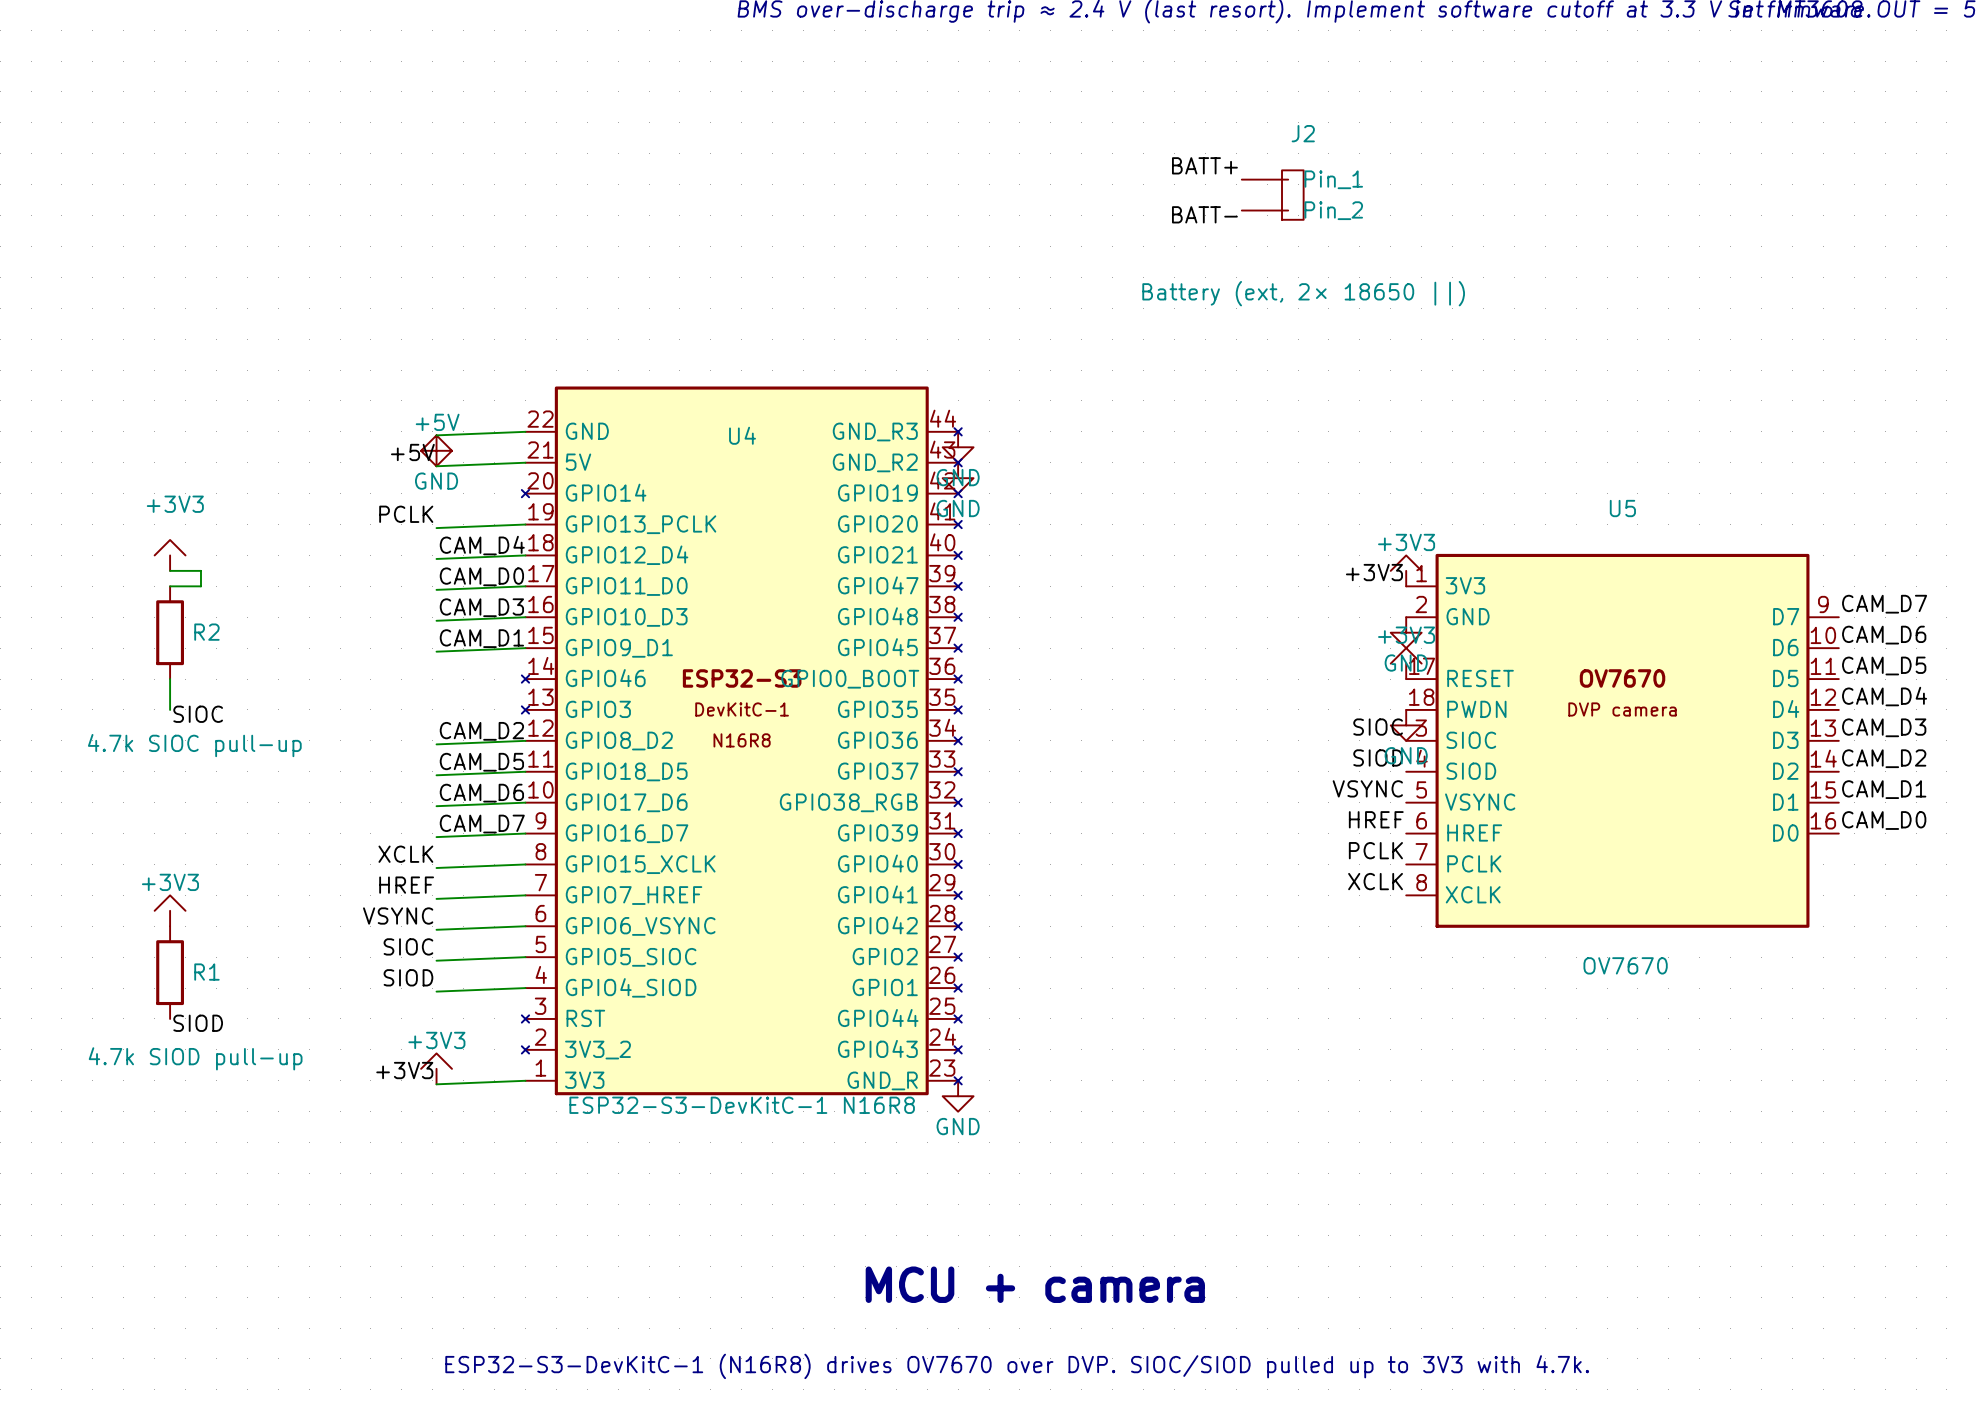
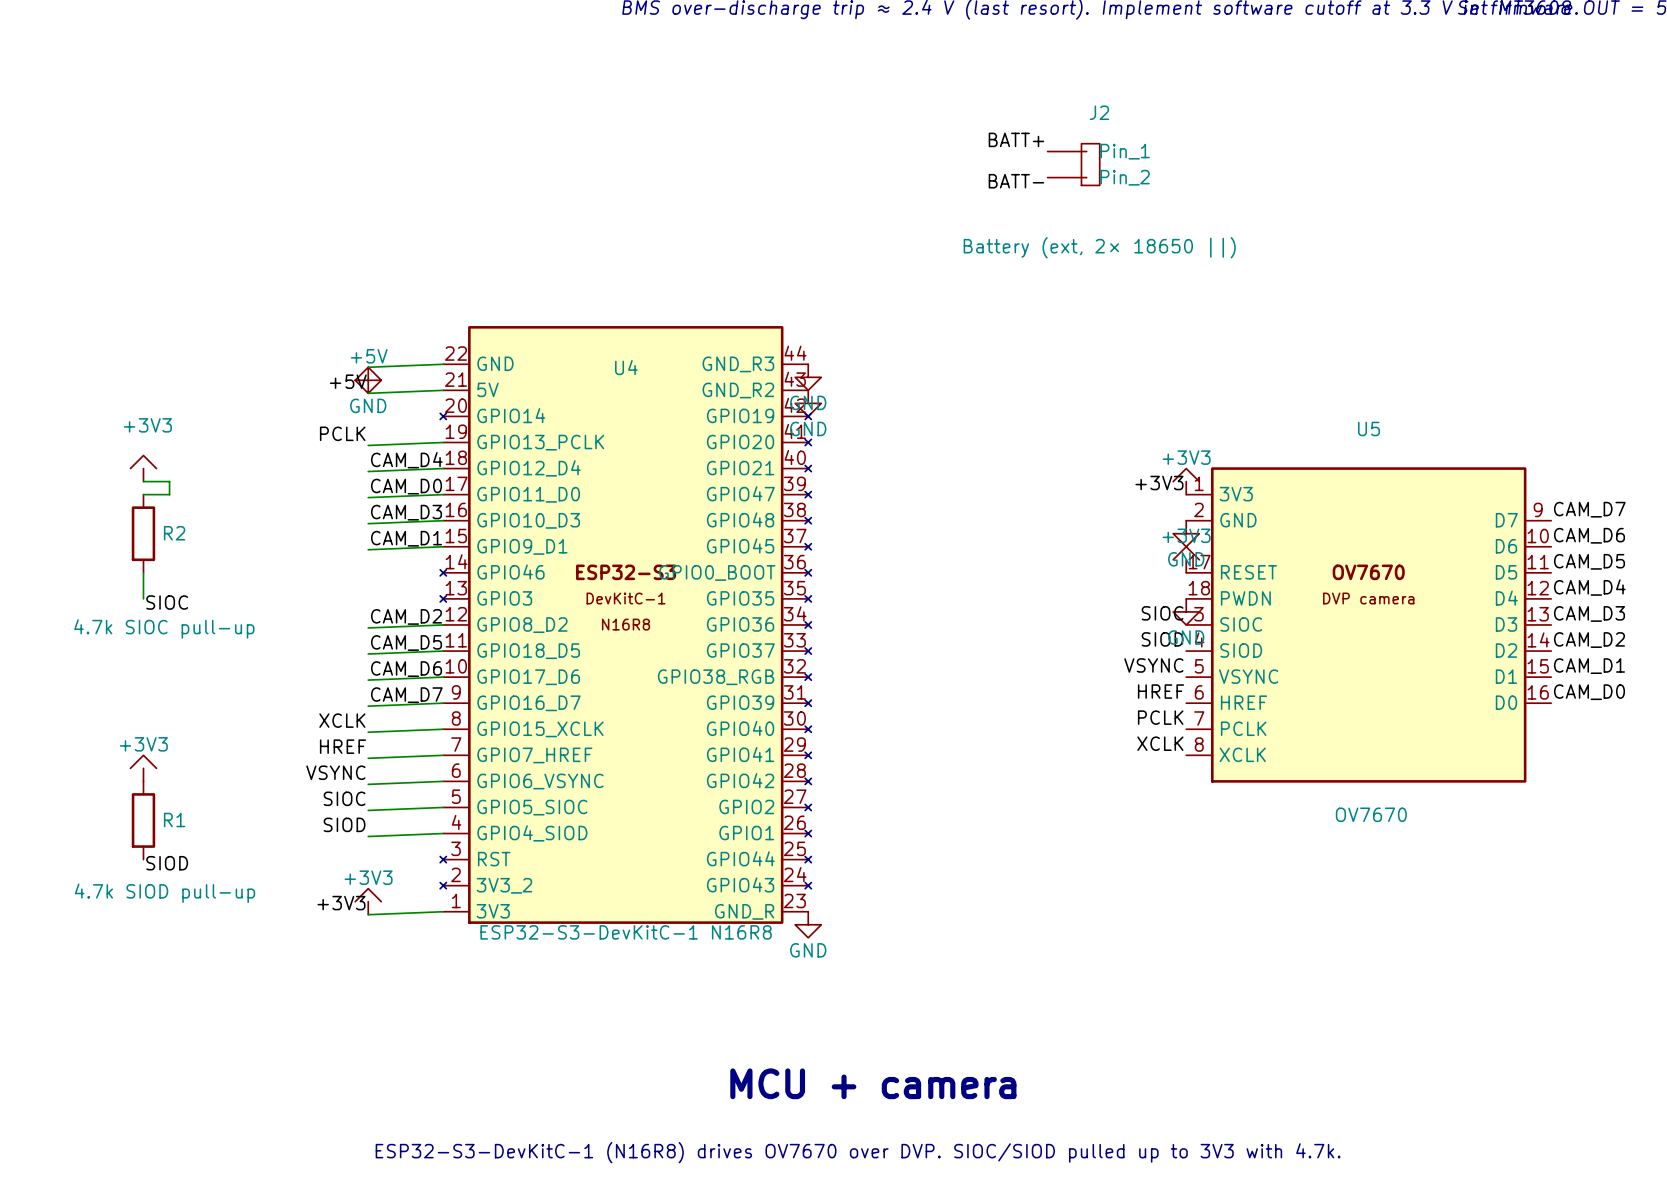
U4 symbol: [521, 386, 962, 1096] -> [440, 326, 812, 924]

